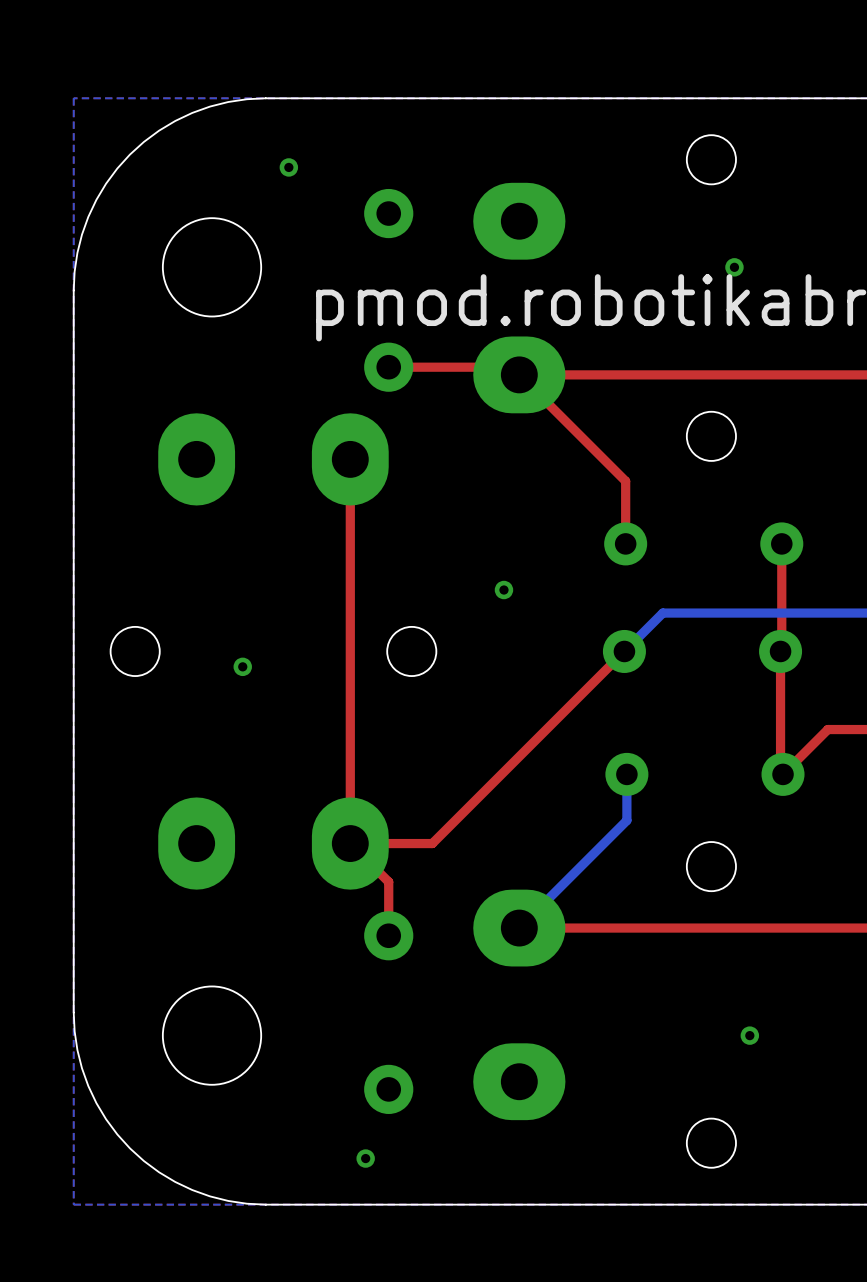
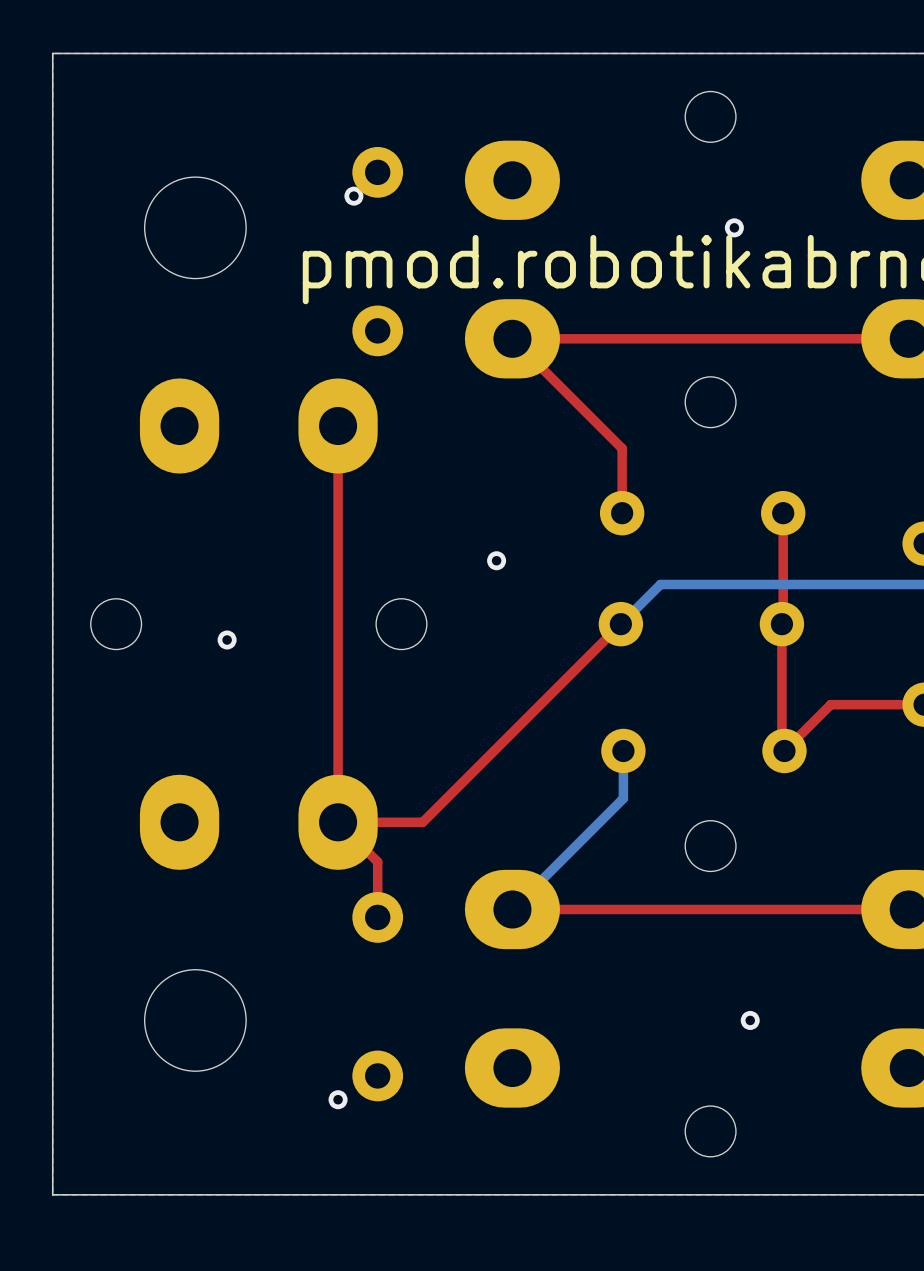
board edge: (265, 98) (228, 101) (192, 112) (159, 130) (129, 154) (106, 183) (88, 216) (77, 252) (73, 290) -> (250, 53) (52, 53) (52, 251)
via position: (288, 167) -> (353, 196)
top track: (388, 367) (511, 367) (519, 374) -> none
board edge: (73, 1012) (77, 1050) (88, 1086) (106, 1119) (129, 1148) (159, 1172) (192, 1190) (228, 1200) (265, 1204) -> (52, 996) (52, 1194) (250, 1194)
via position: (365, 1158) -> (338, 1099)

